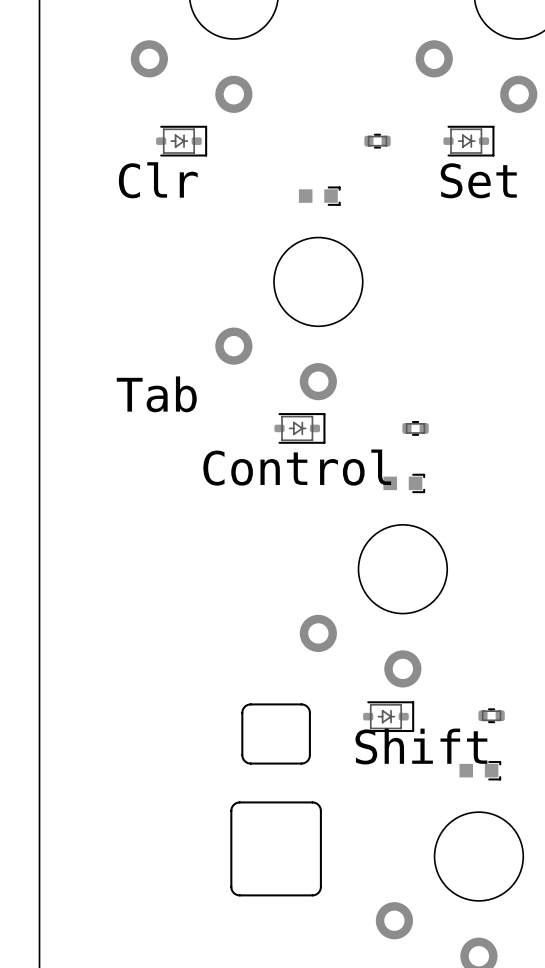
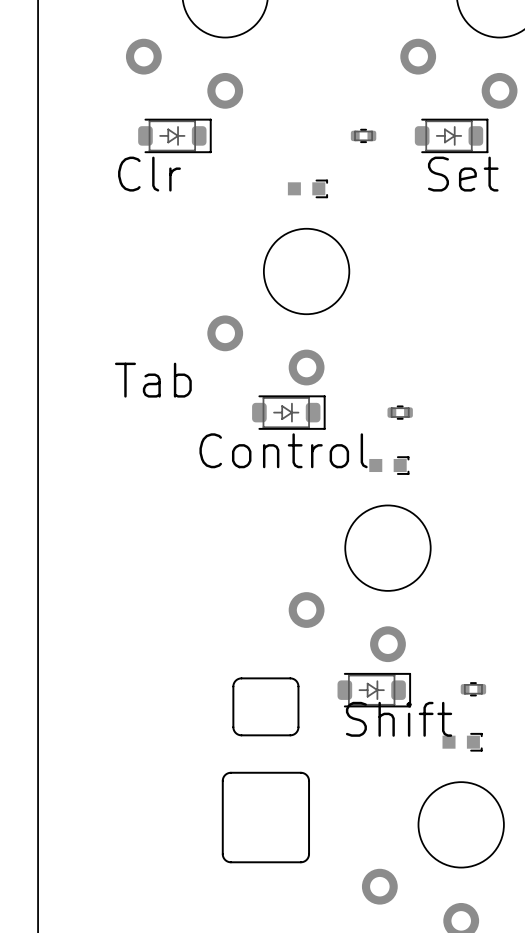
part footprint: [156, 125, 208, 157] -> [138, 118, 212, 154]
part footprint: [443, 125, 495, 157] -> [414, 118, 489, 154]
part footprint: [274, 413, 326, 444] -> [252, 395, 326, 430]
part footprint: [363, 701, 415, 733] -> [337, 672, 412, 708]

